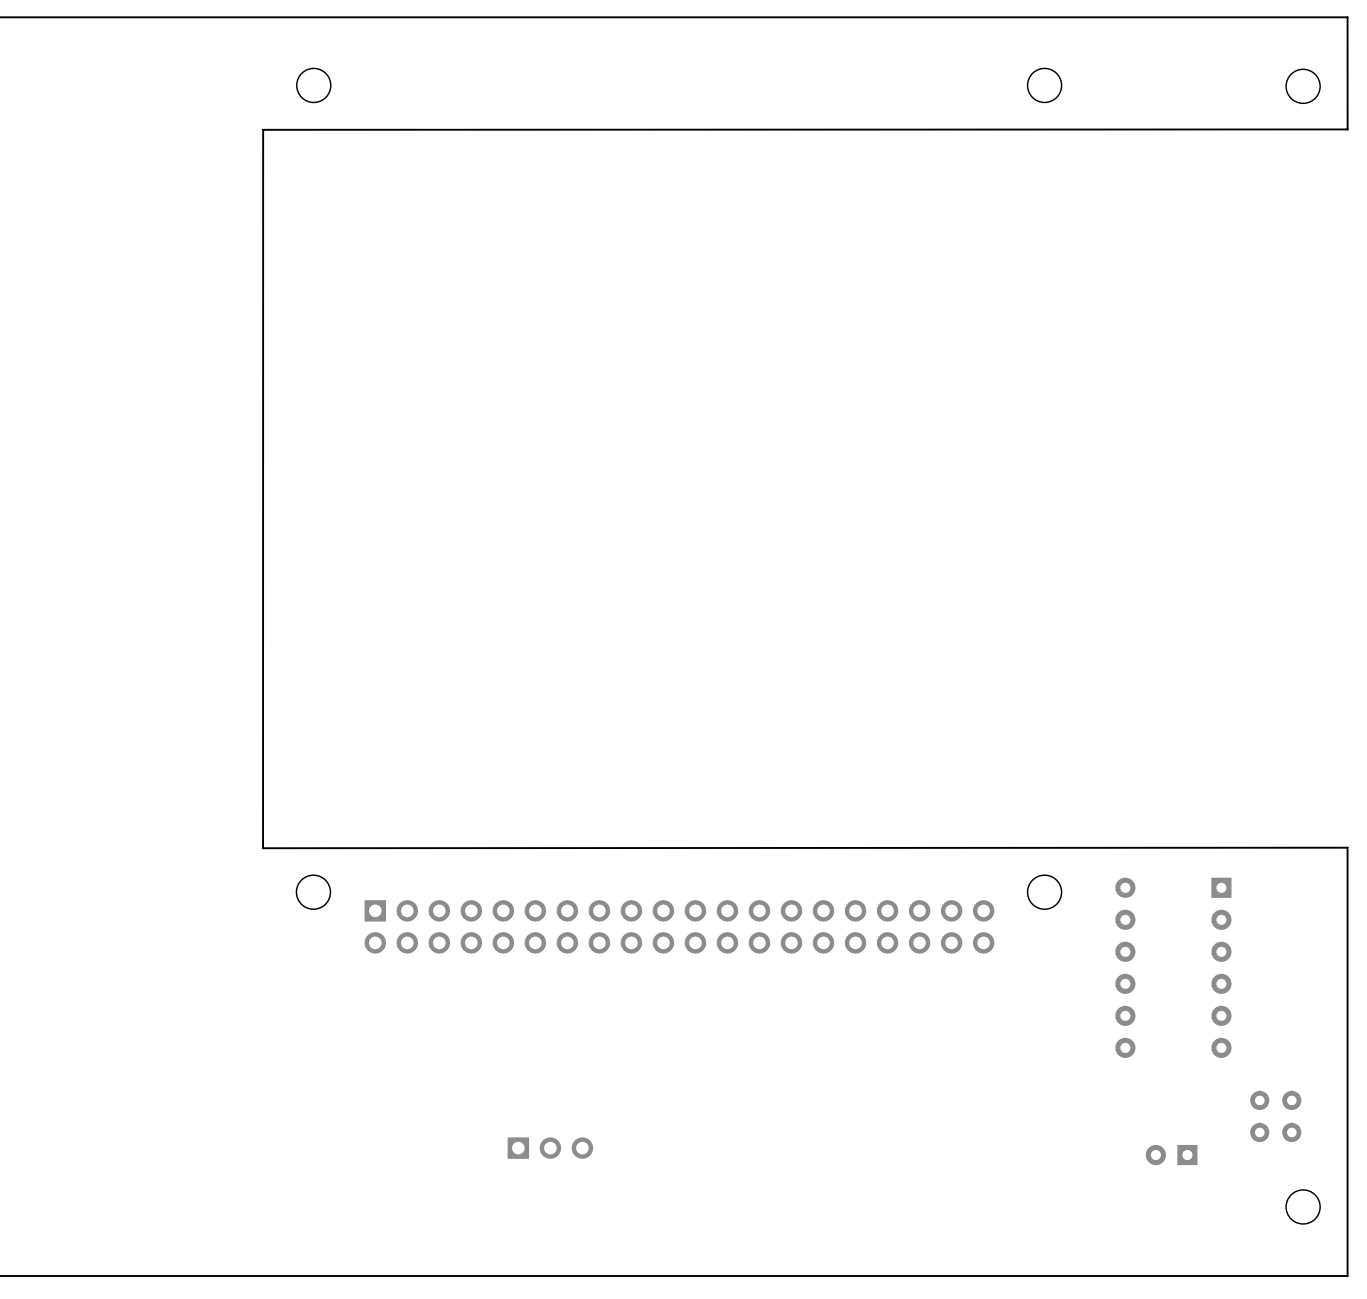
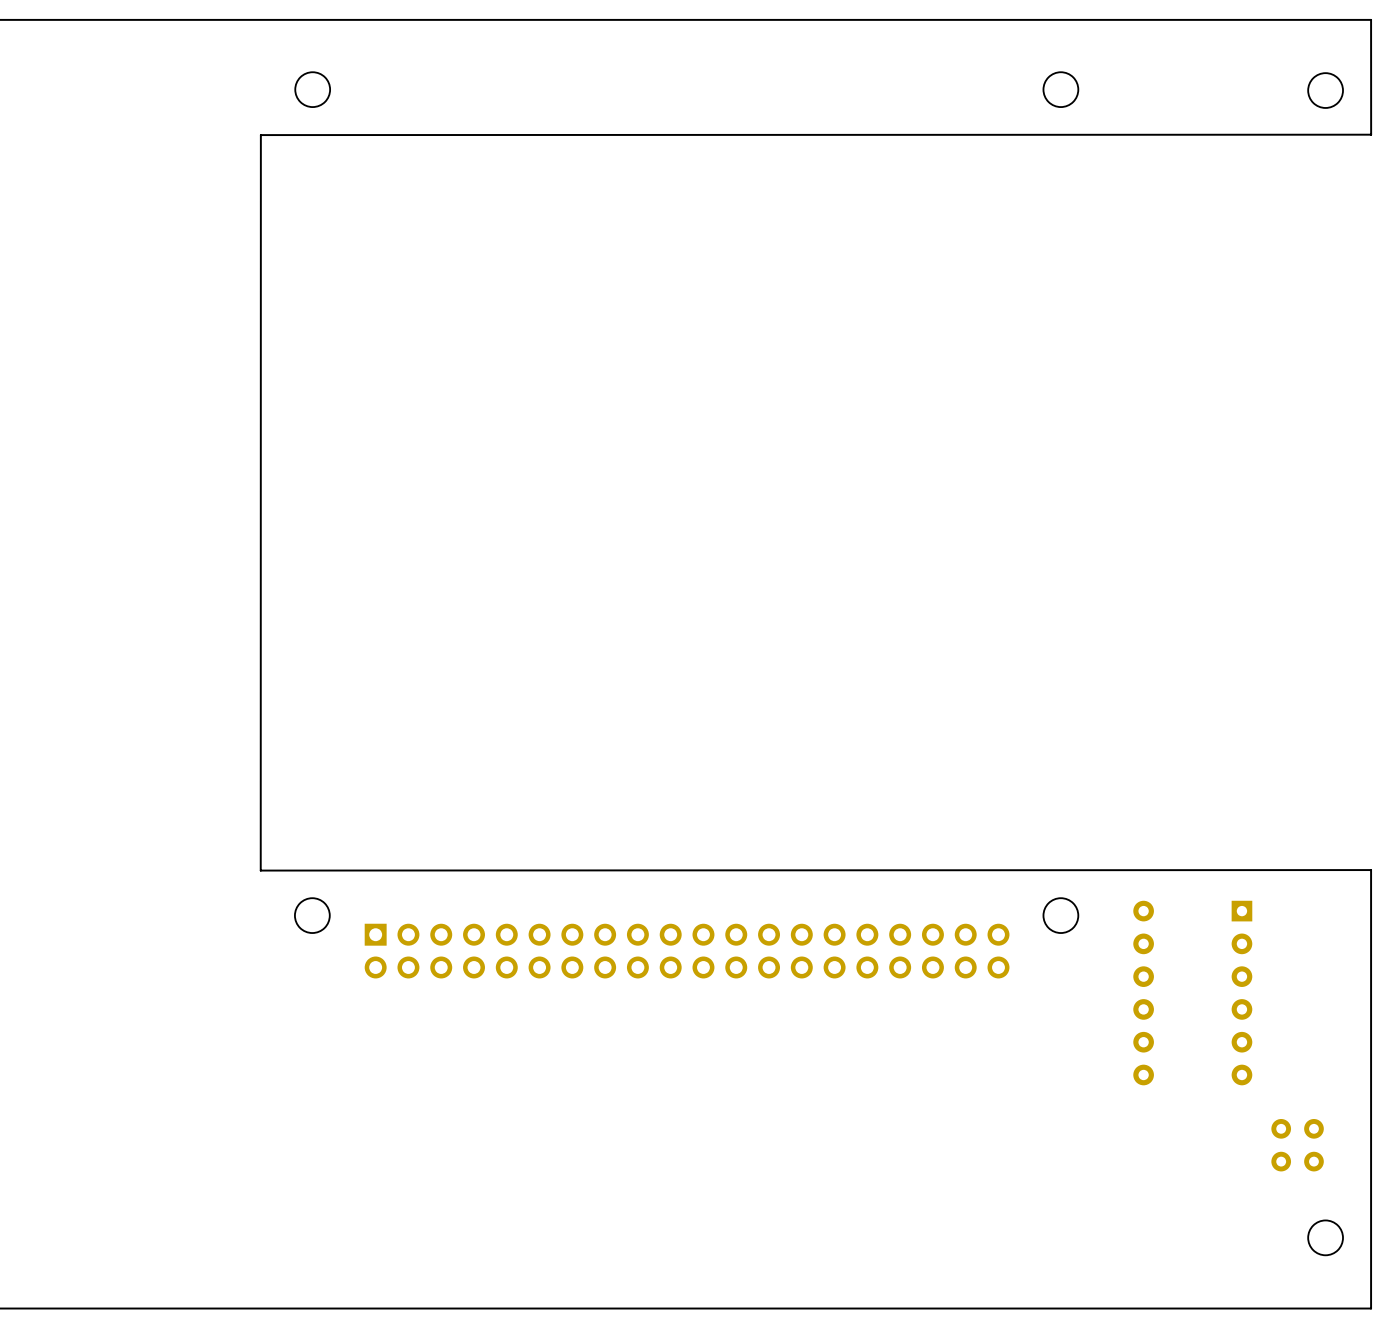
part: (550, 1148) -> none
part: (1171, 1155) -> none

